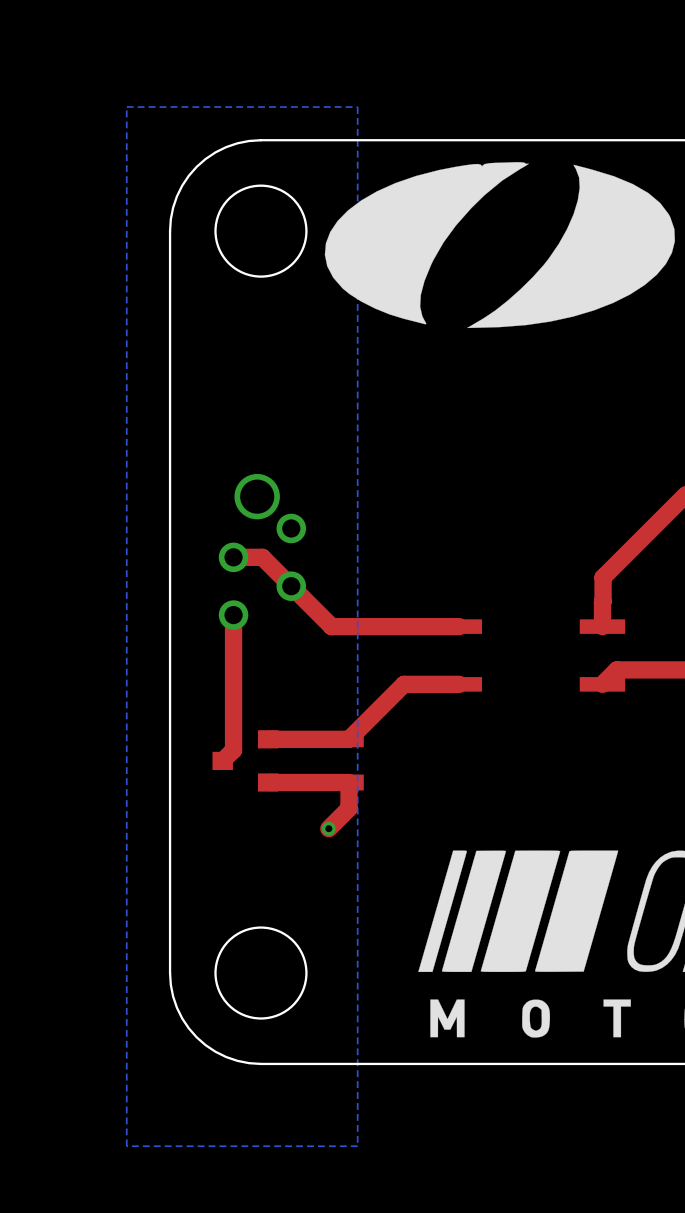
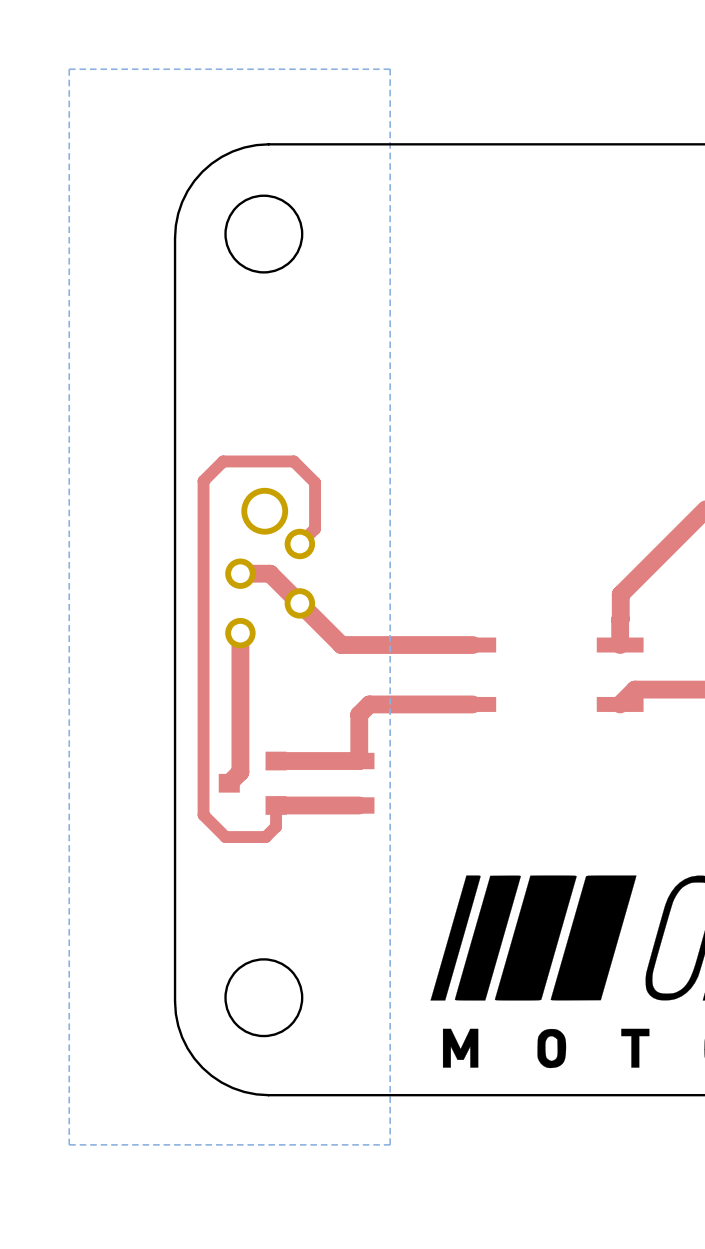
bottom zone outline: (357, 107) (126, 107) (126, 1146) (357, 1146) (357, 107) -> (390, 69) (390, 1144) (69, 1144) (69, 69) (390, 69)
drawing: [324, 162, 675, 329] -> none
round board edge size: [214, 184, 308, 278] -> [224, 194, 304, 274]
top track: none -> (299, 543) (315, 528) (315, 482) (293, 461) (223, 461) (203, 481) (203, 815) (225, 837) (265, 837) (276, 826) (276, 805)
top track: (403, 684) (349, 739) -> (415, 704) (369, 704) (359, 714) (359, 761)
top track: (349, 782) (349, 808) (328, 828) -> none
via: (328, 828) -> none
round board edge size: [214, 926, 308, 1020] -> [224, 958, 304, 1038]

